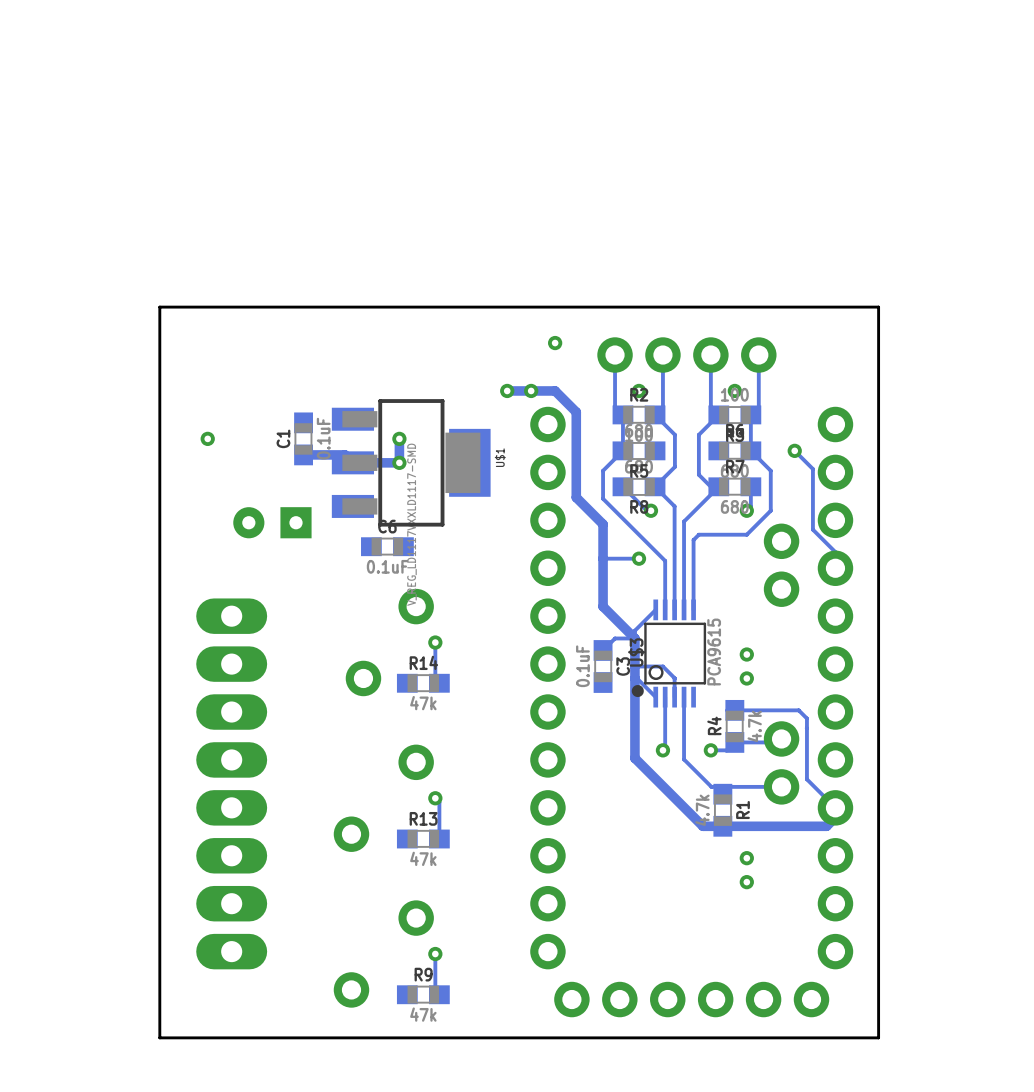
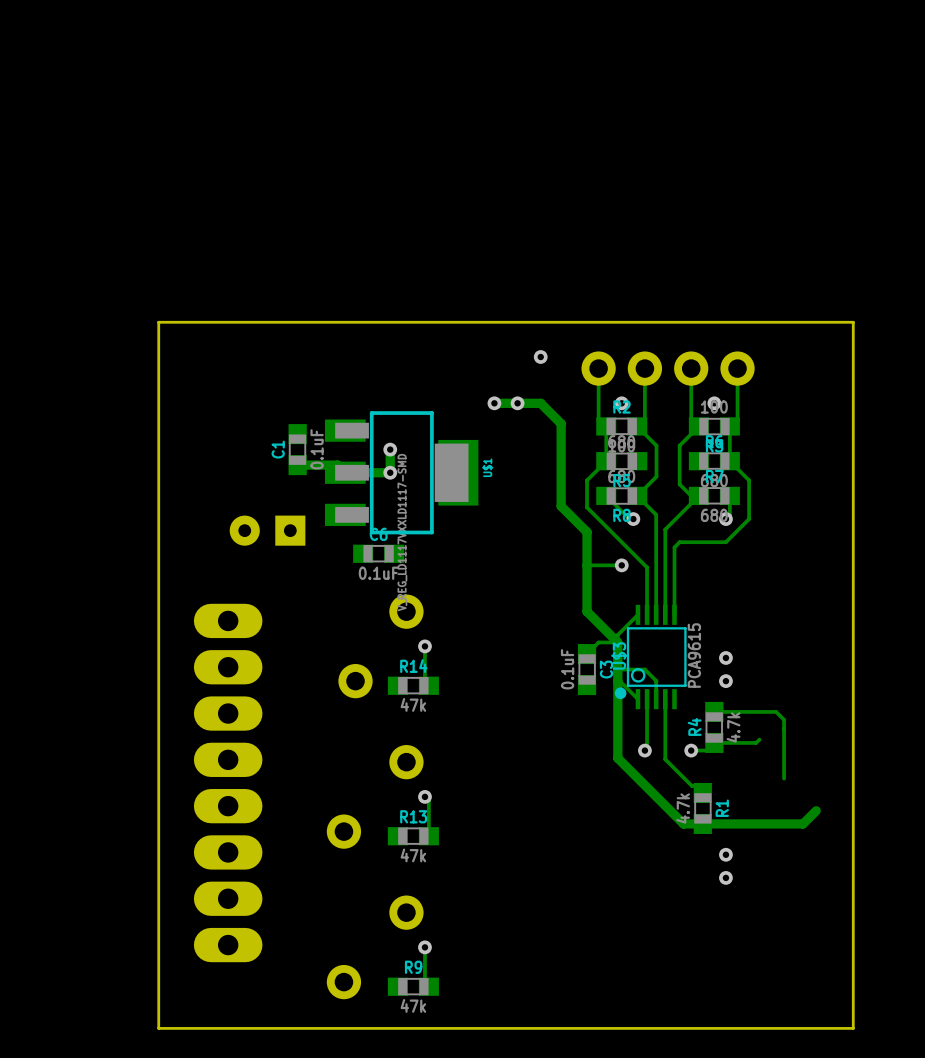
via: (207, 438) -> none
track: (794, 450) (812, 469) (812, 529) (835, 552) (835, 568) -> none
via: (794, 450) -> none
part: (691, 712) -> none
track: (806, 779) (840, 812) -> none
track: (781, 786) (715, 786) -> none

